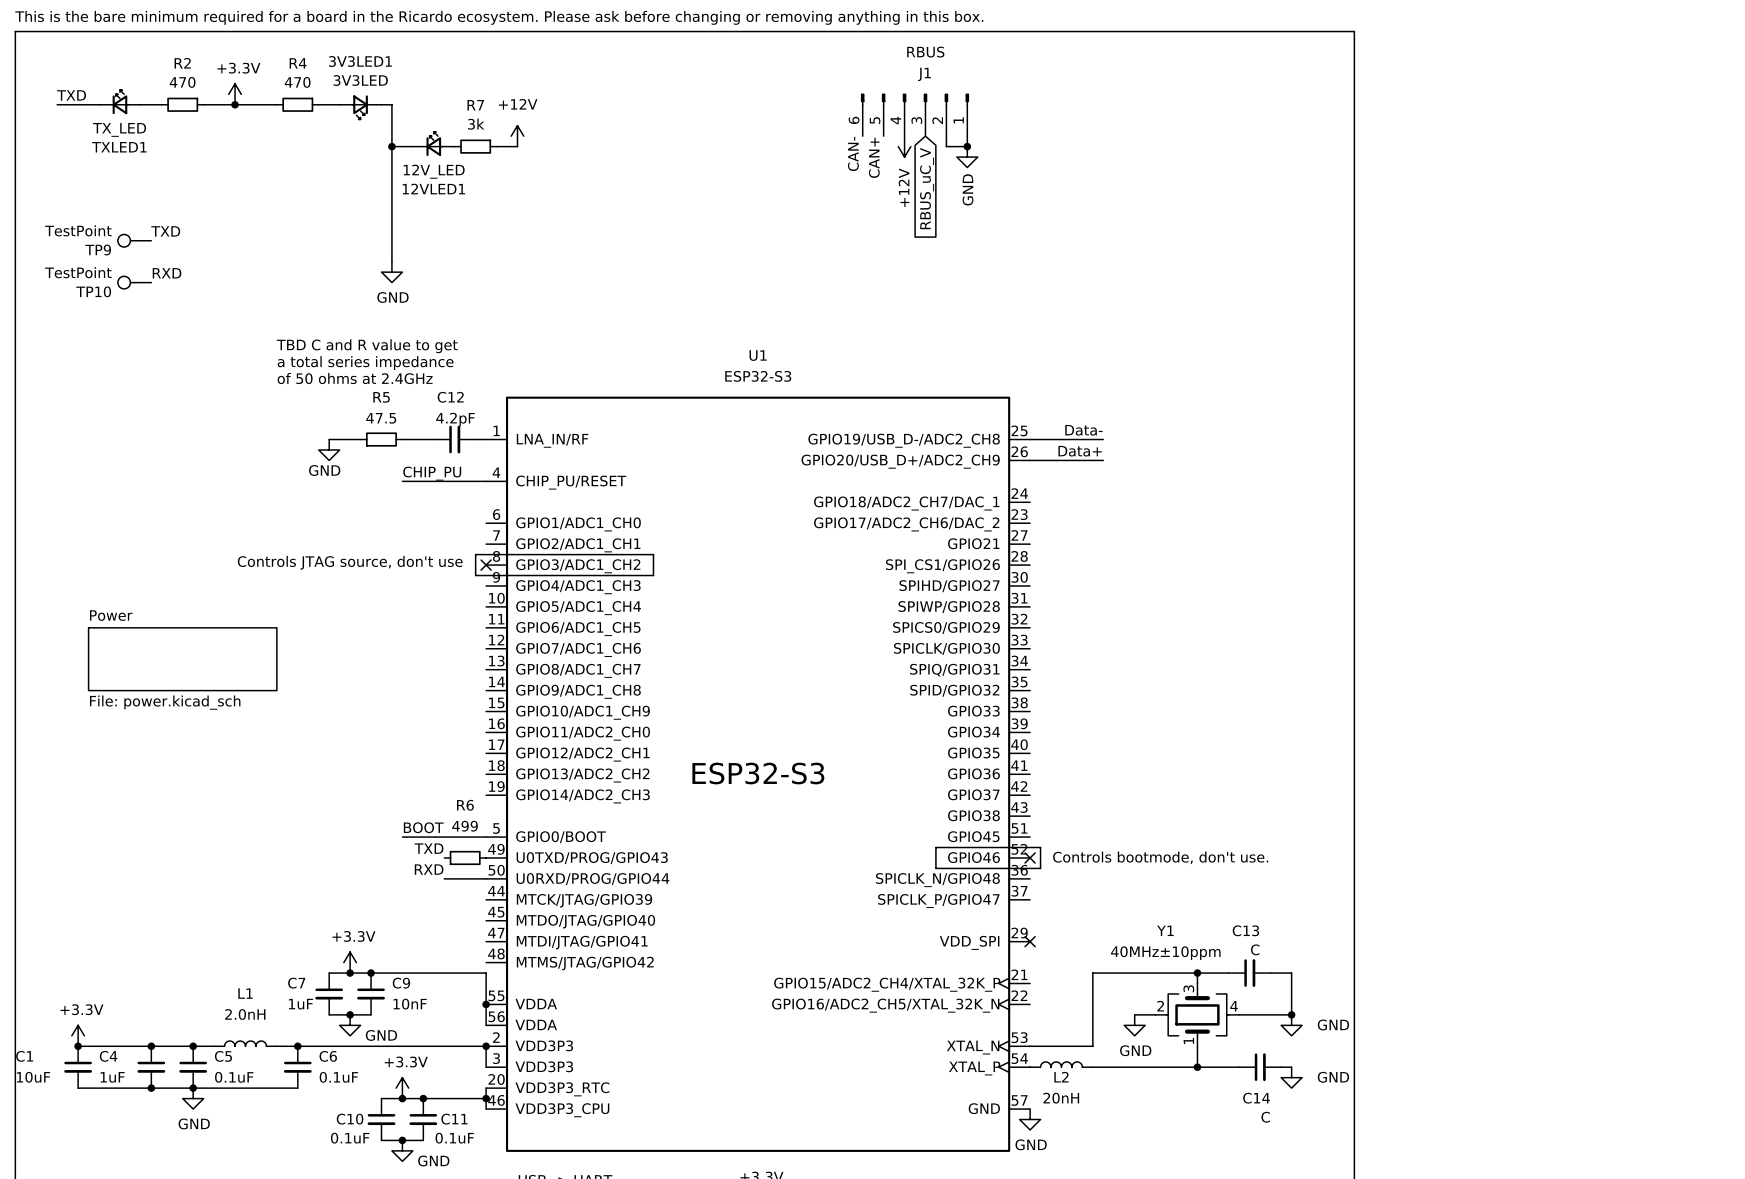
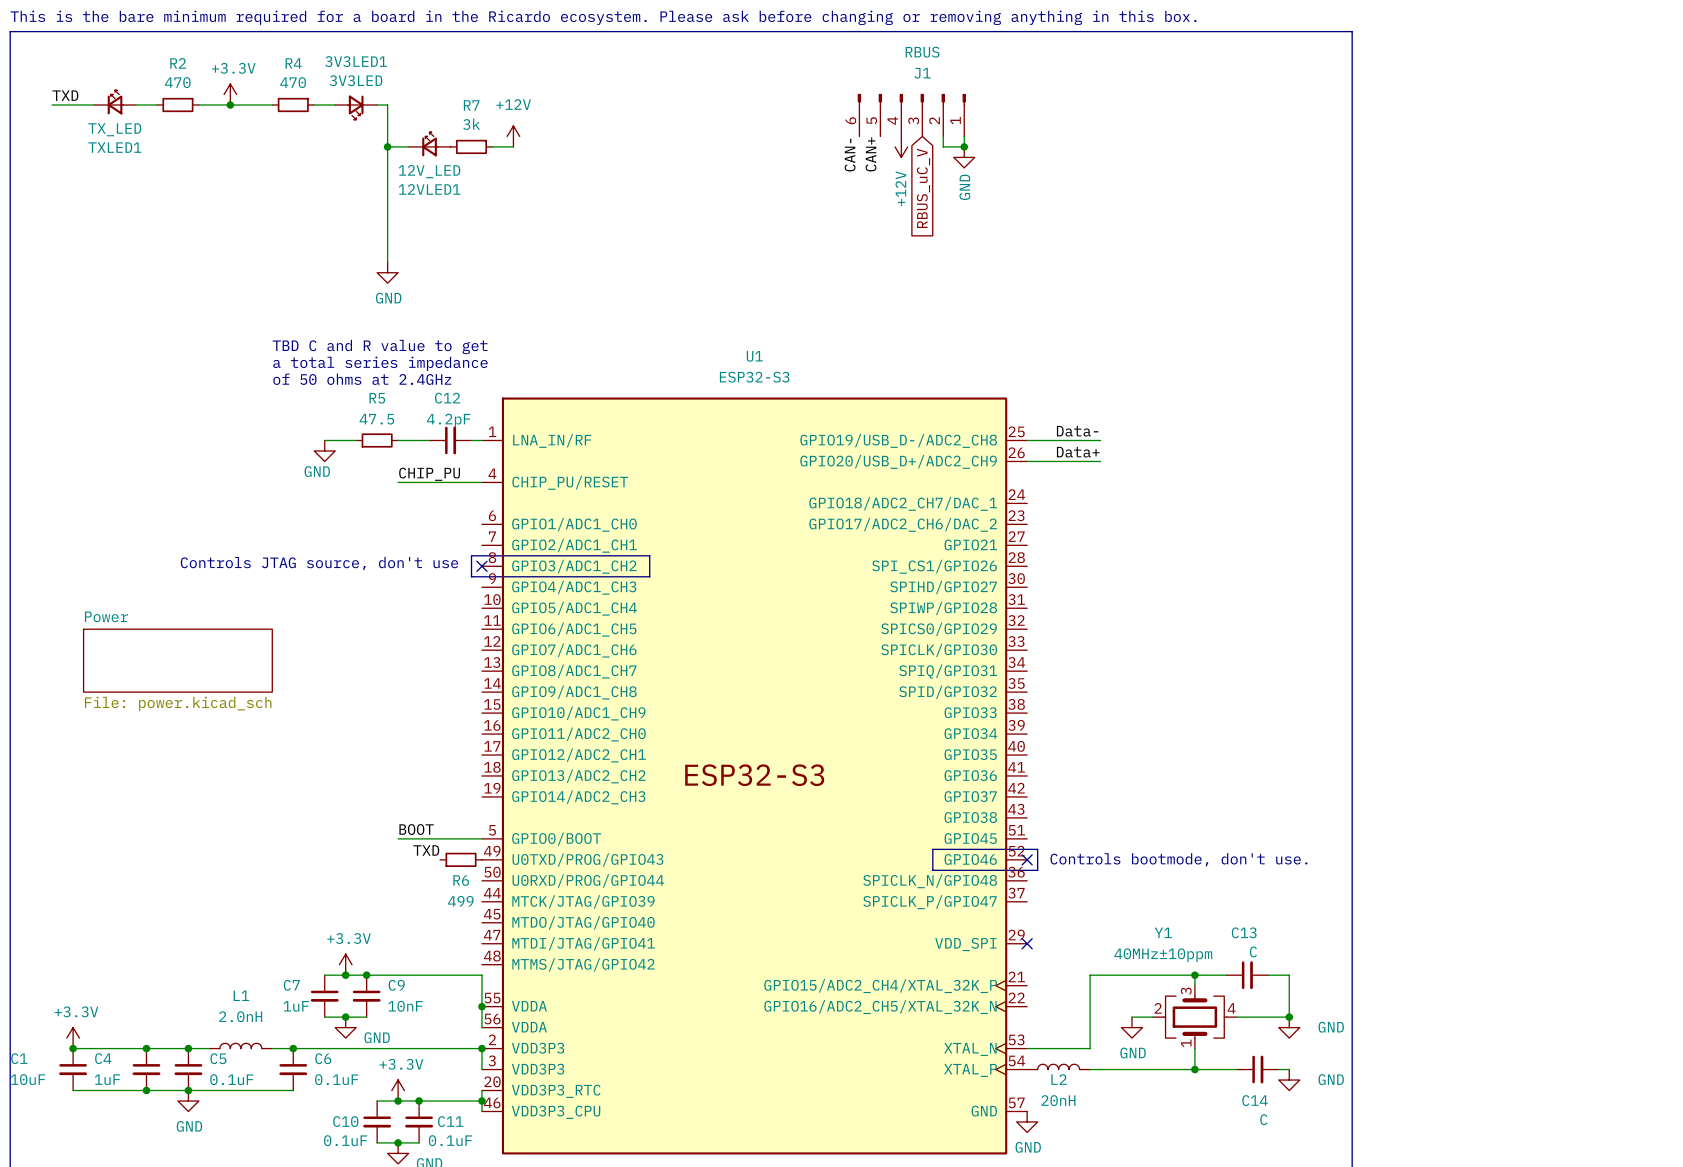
label: TXD (165, 231) -> none
TP9: TestPoint (134, 240) -> none
label: RXD (167, 273) -> none
TP10: TestPoint (134, 282) -> none
R6 name position: R6 (465, 805) -> R6 (461, 880)
R6 value position: 499 (465, 826) -> 499 (460, 901)
label: RXD (429, 869) -> none
wire: (444, 878) (486, 878) -> none

